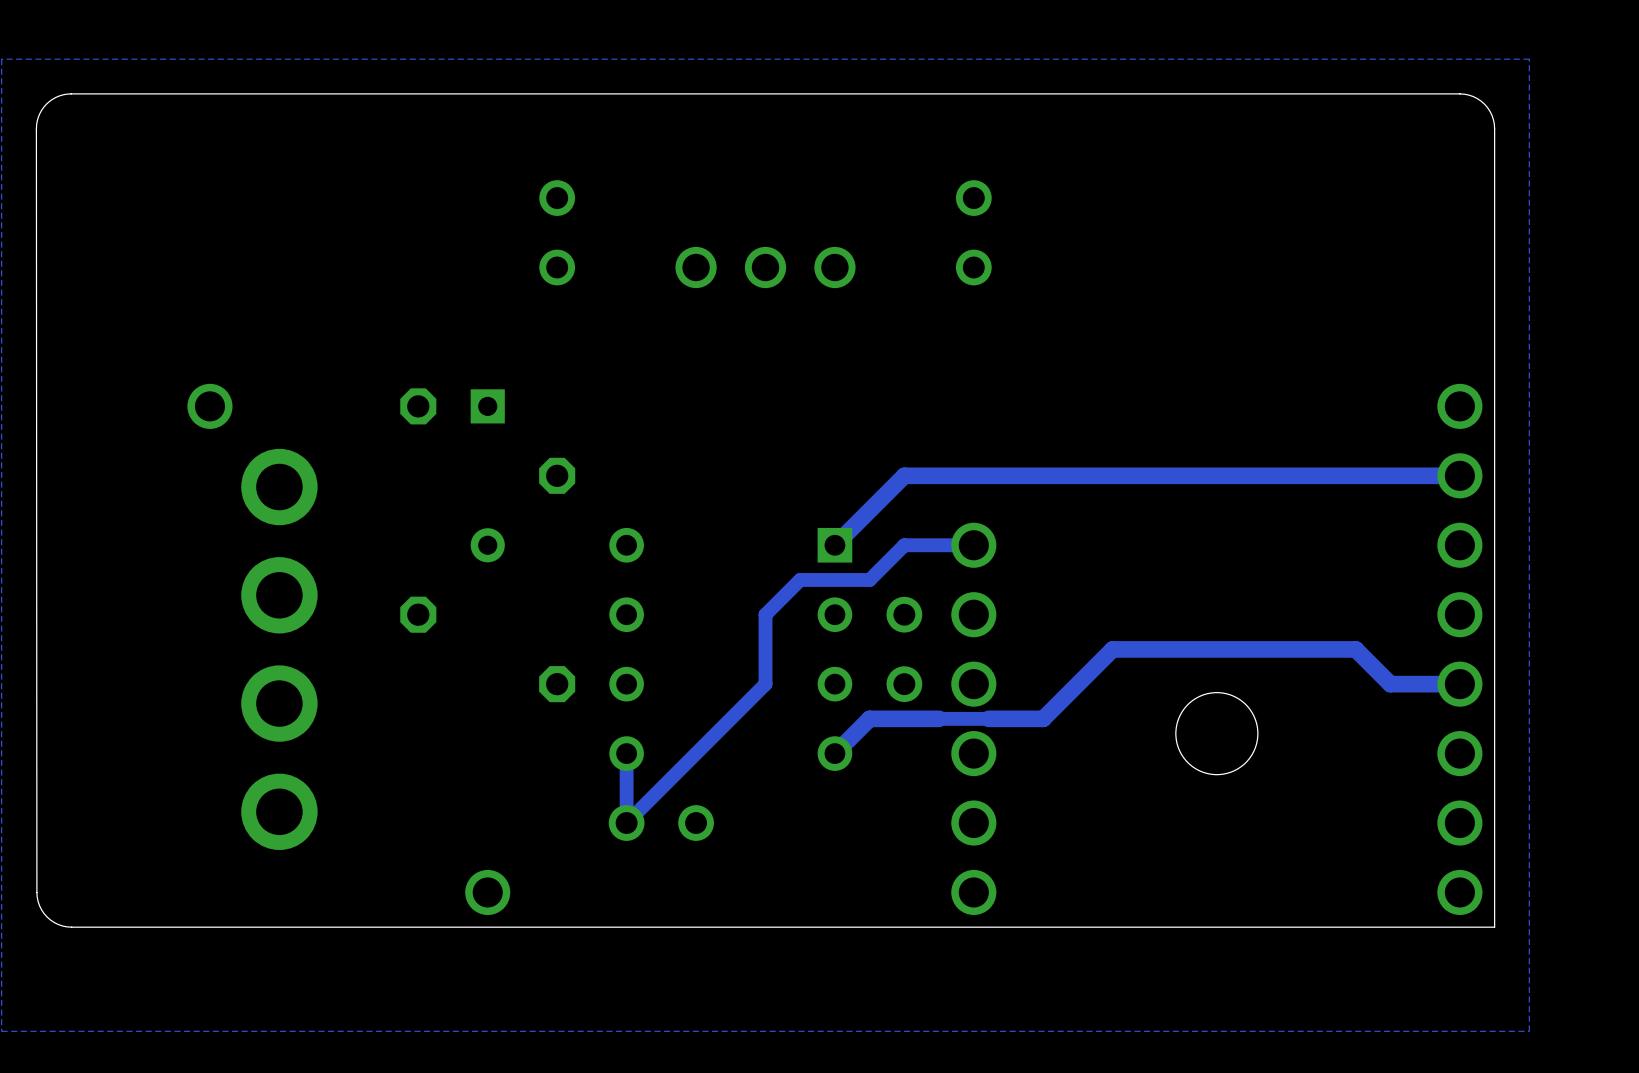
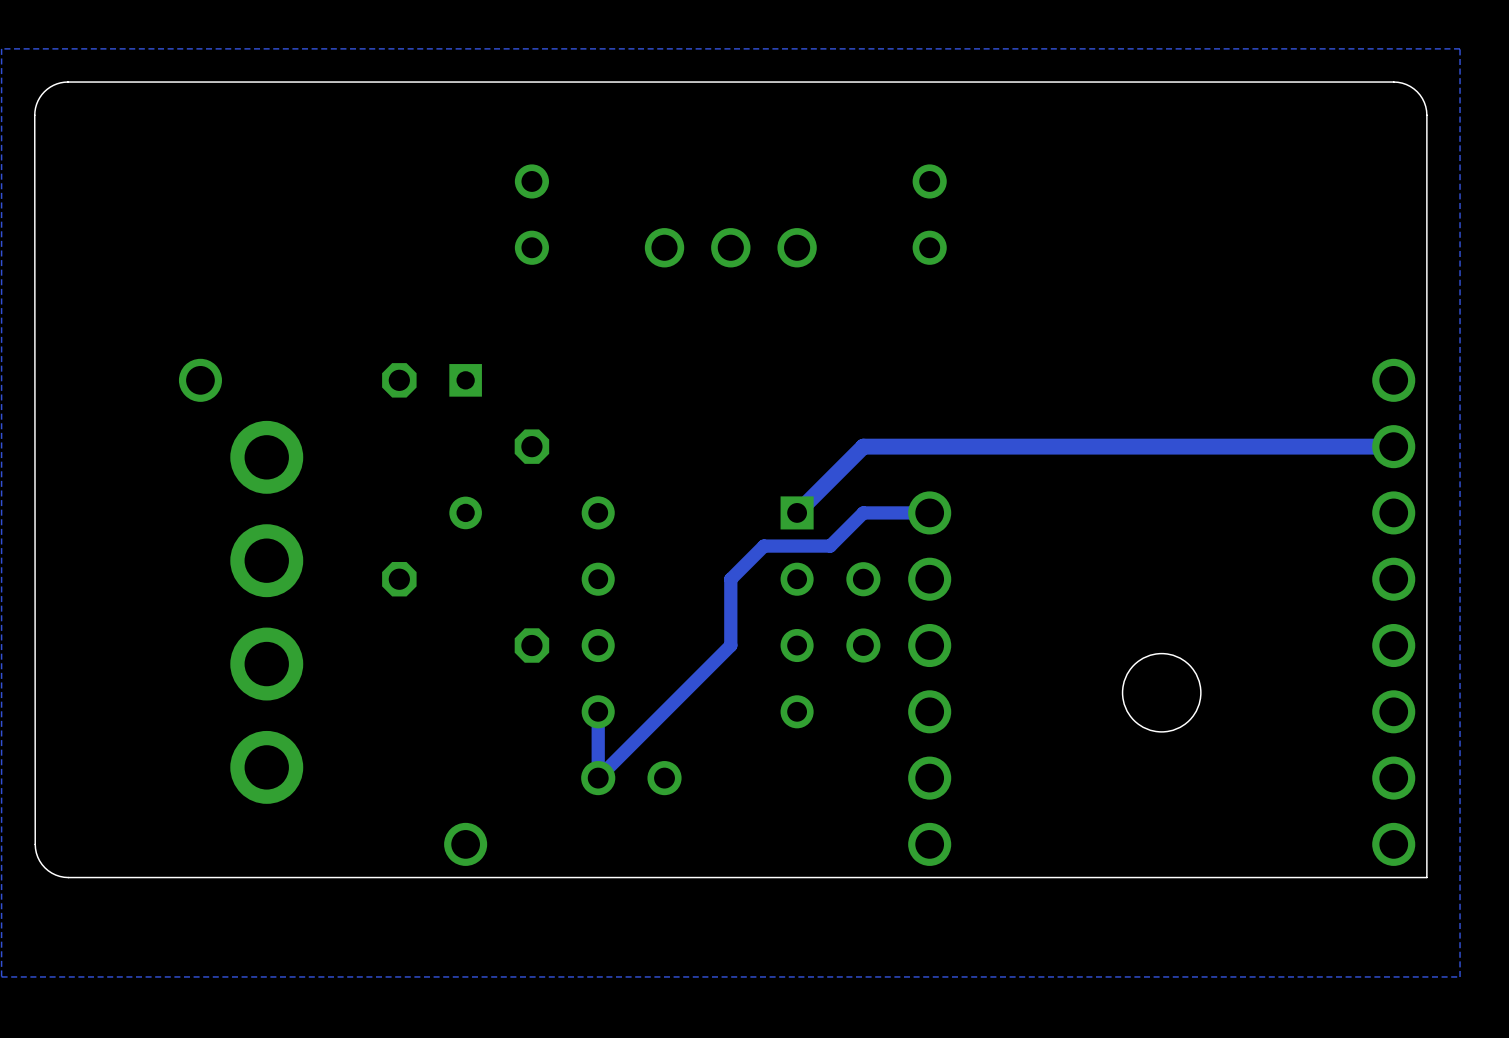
track: (1459, 684) (1390, 684) (1355, 649) (1112, 649) (1043, 718) (869, 718) (834, 753) -> none

